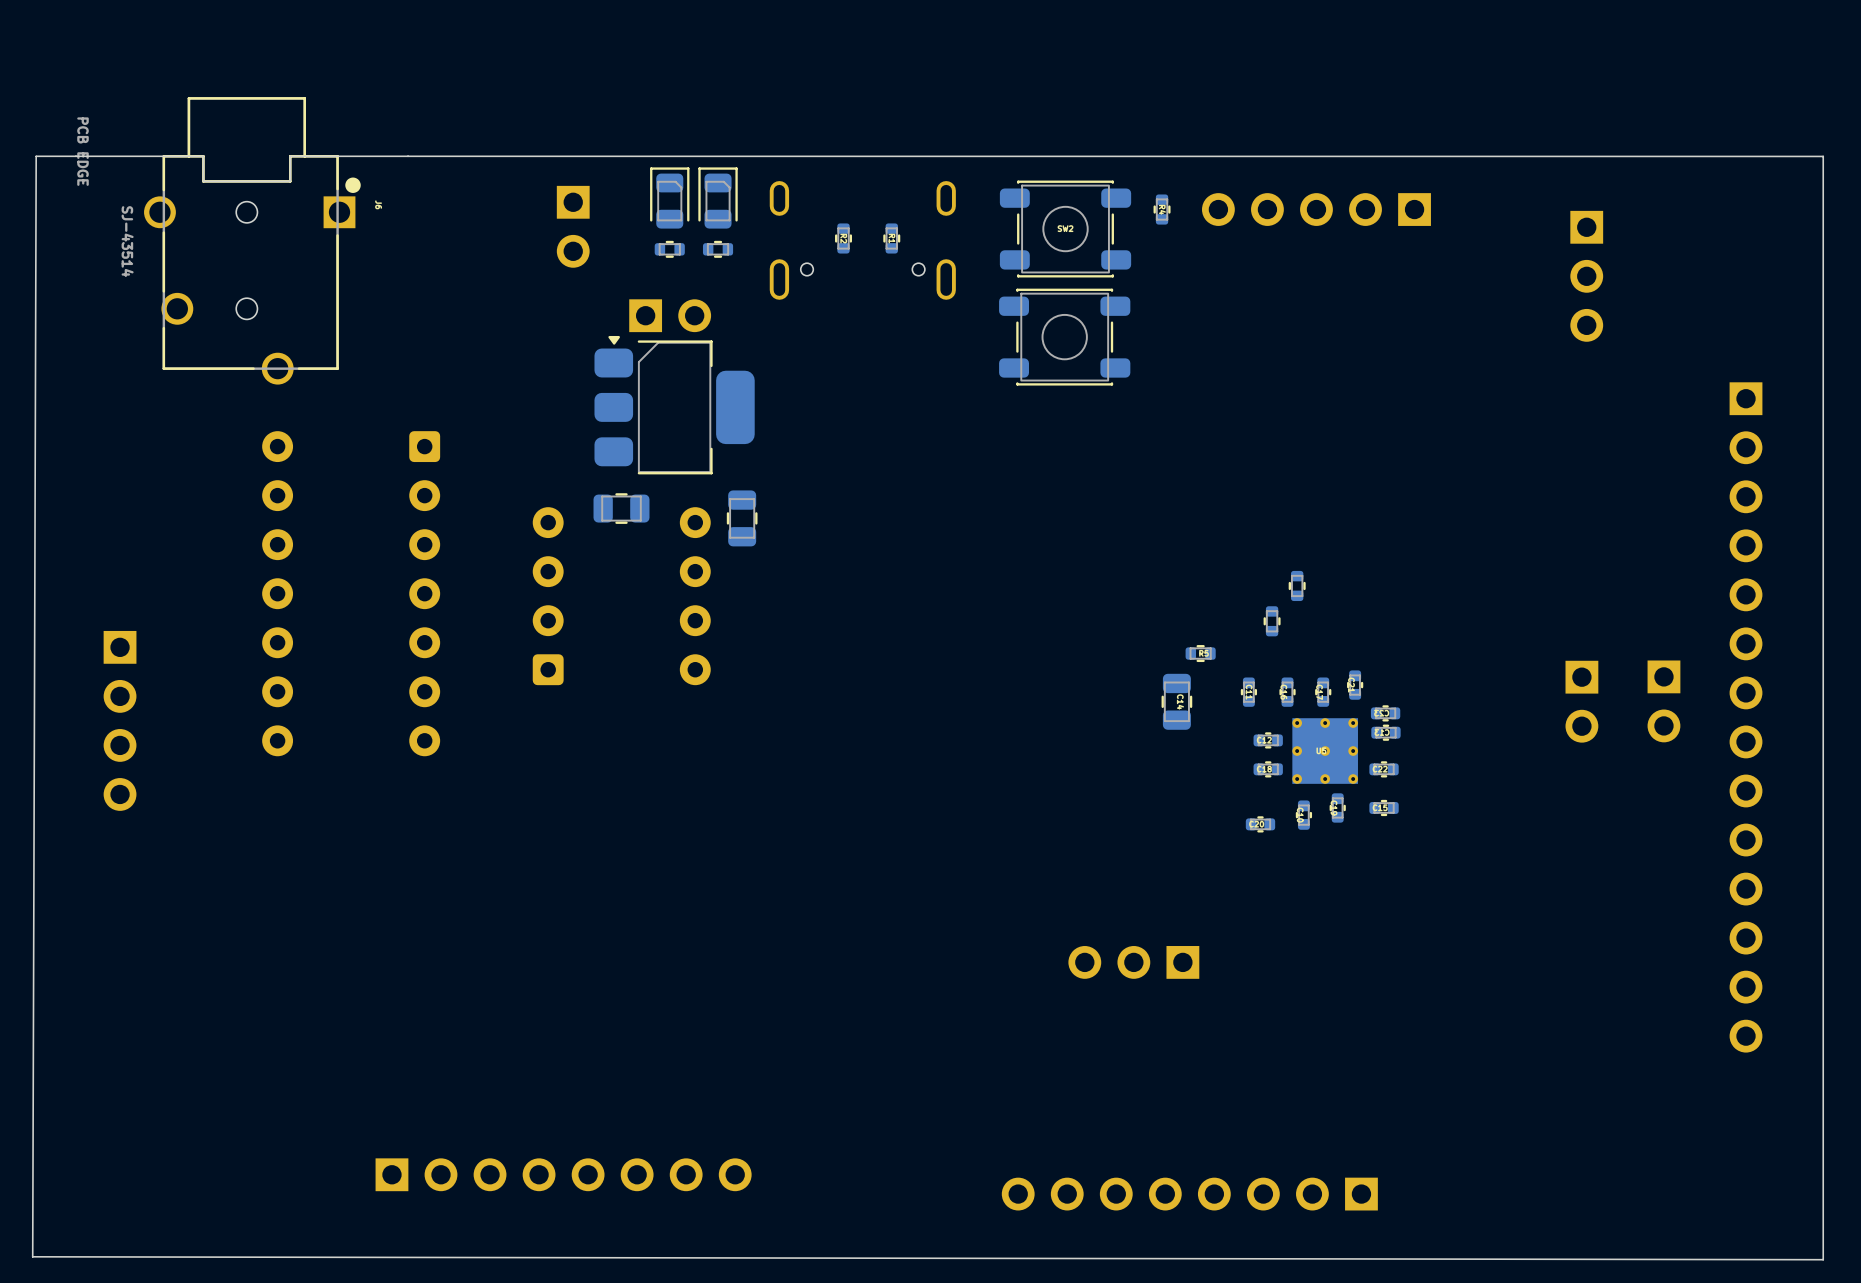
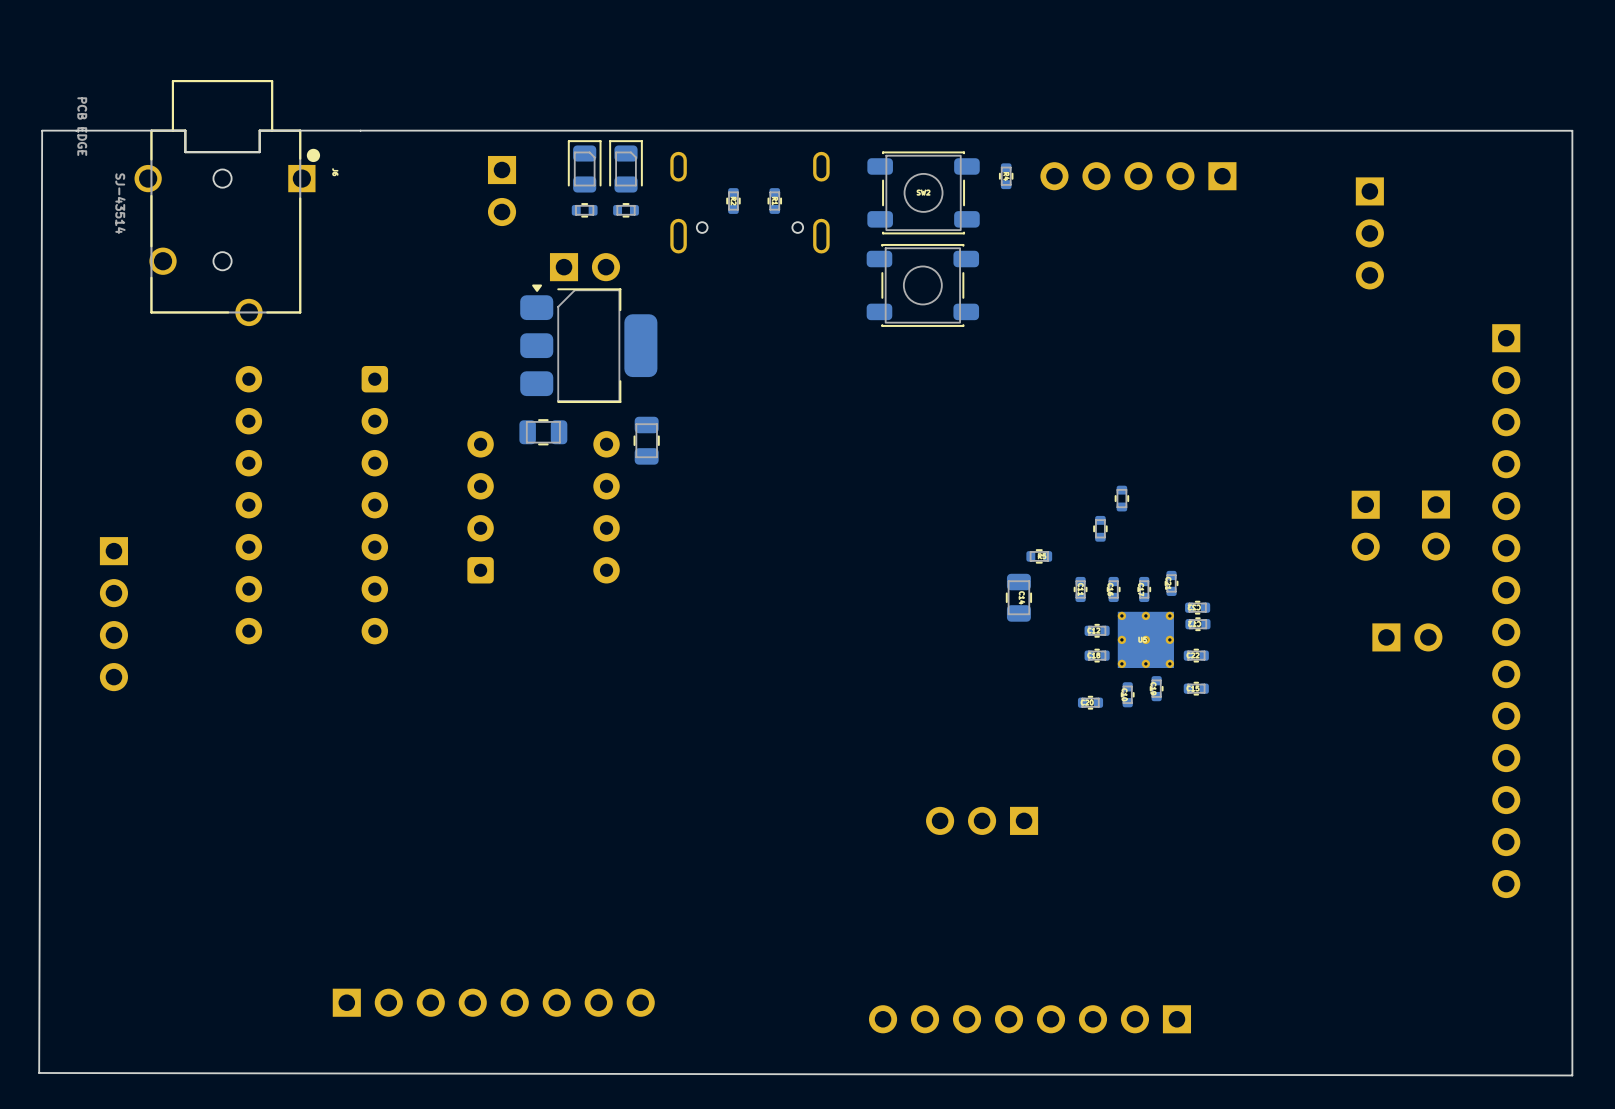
part: none -> (1365, 525)
part: none -> (1435, 525)
part: (1581, 701) -> none
part: (1663, 701) -> none
part: none -> (1407, 637)

